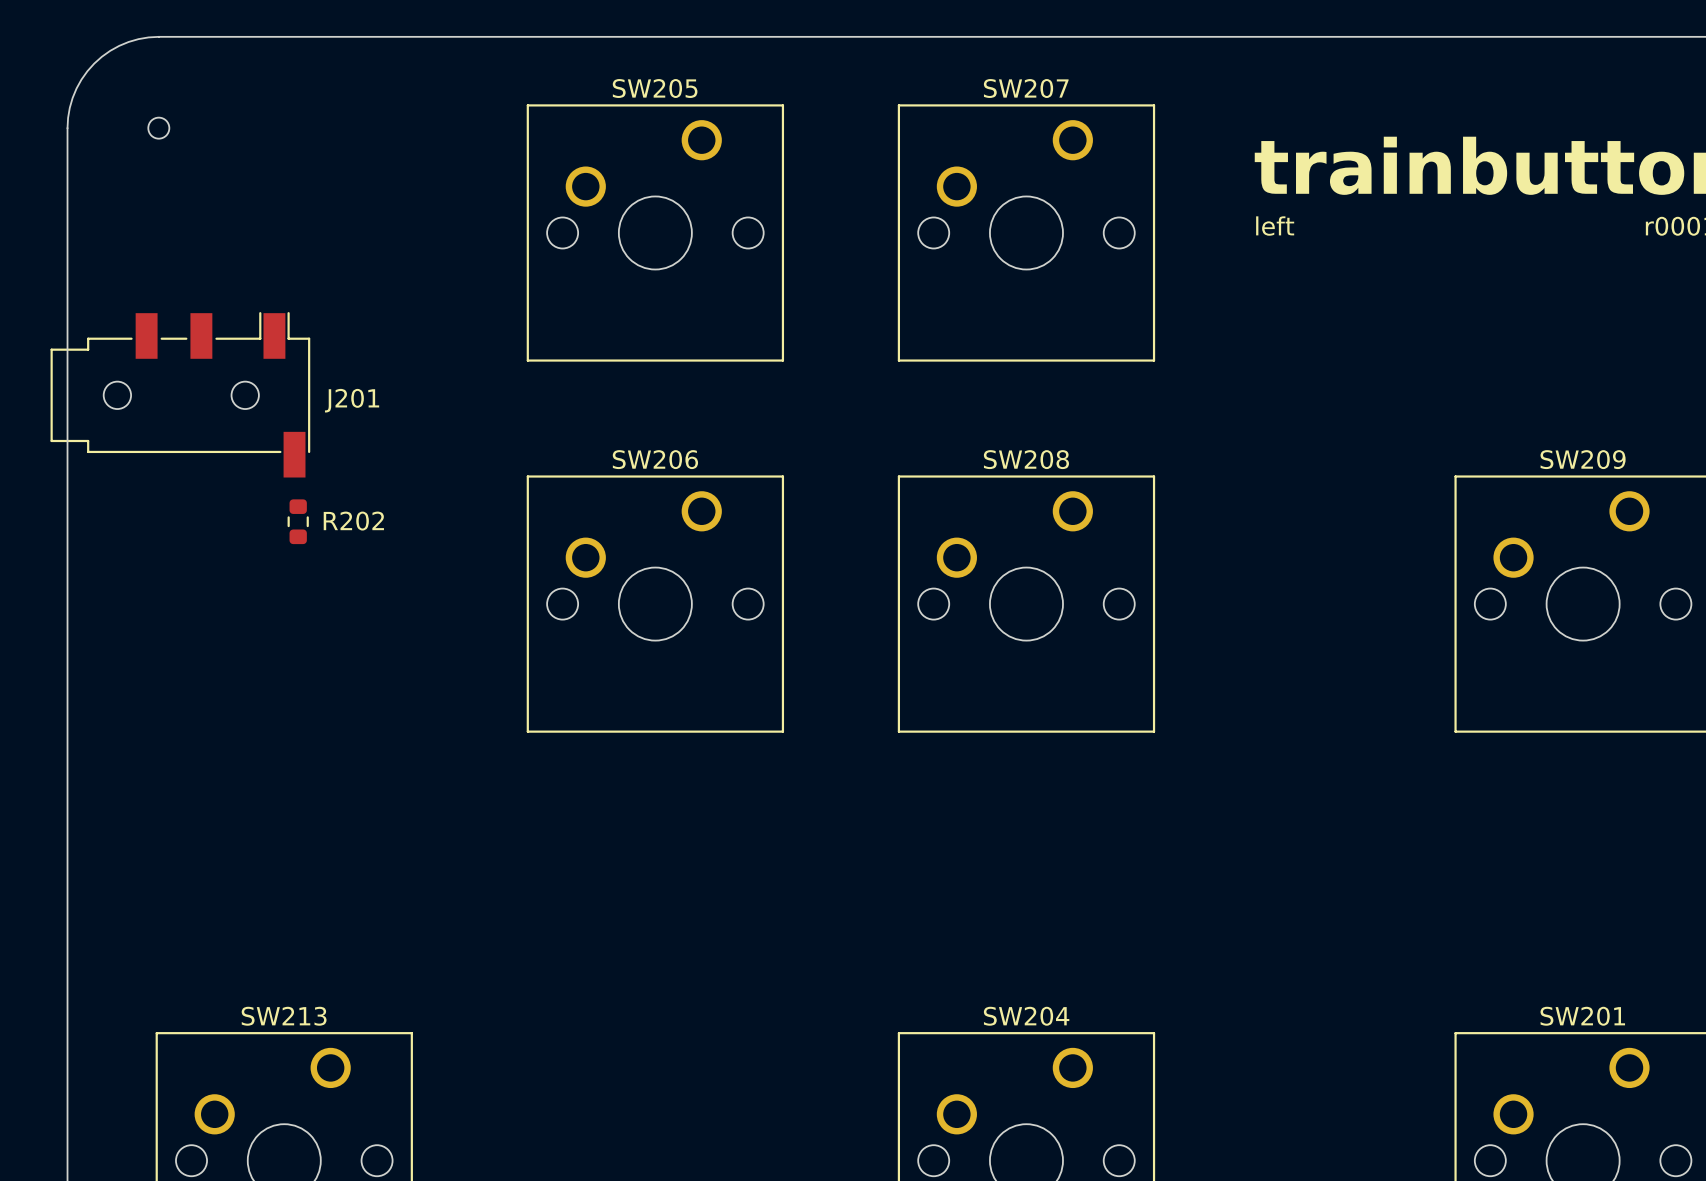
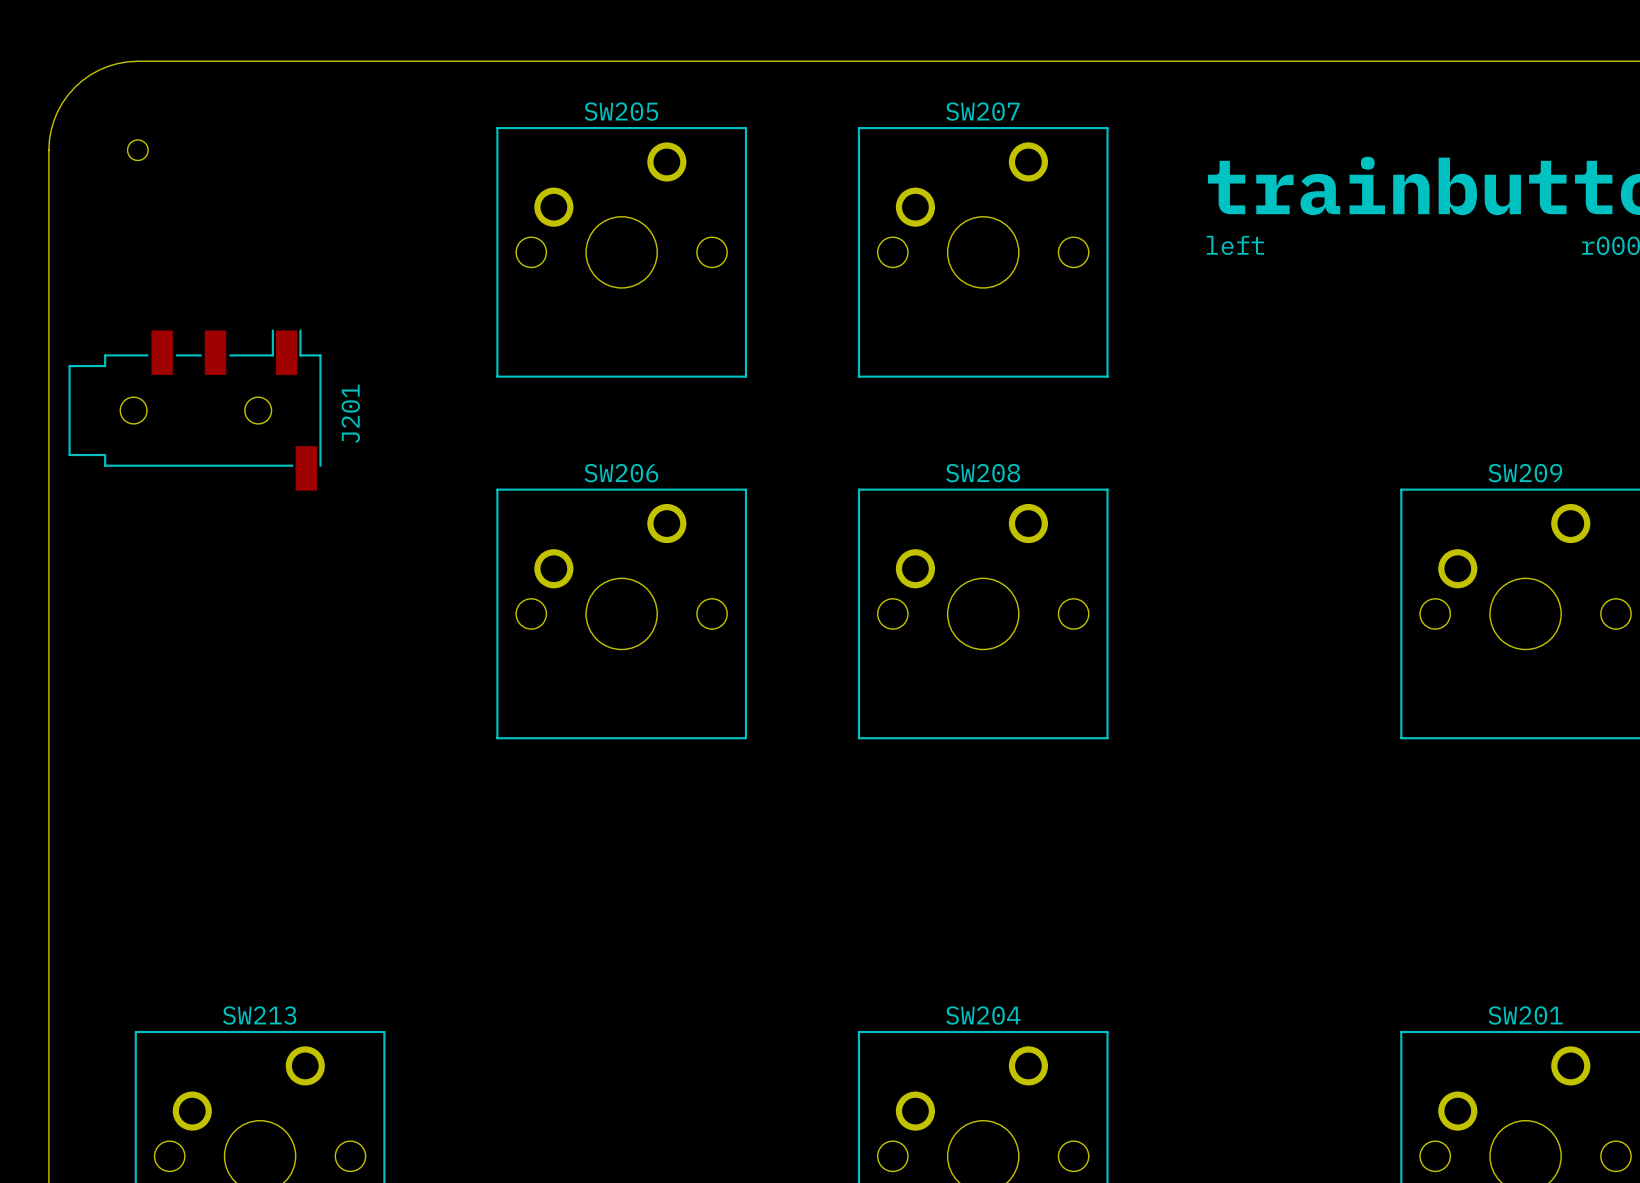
J201 position: (180, 394) -> (195, 410)
J201 name rotation: 0° (352, 400) -> 90° counterclockwise (350, 413)
R202: (298, 521) -> none

